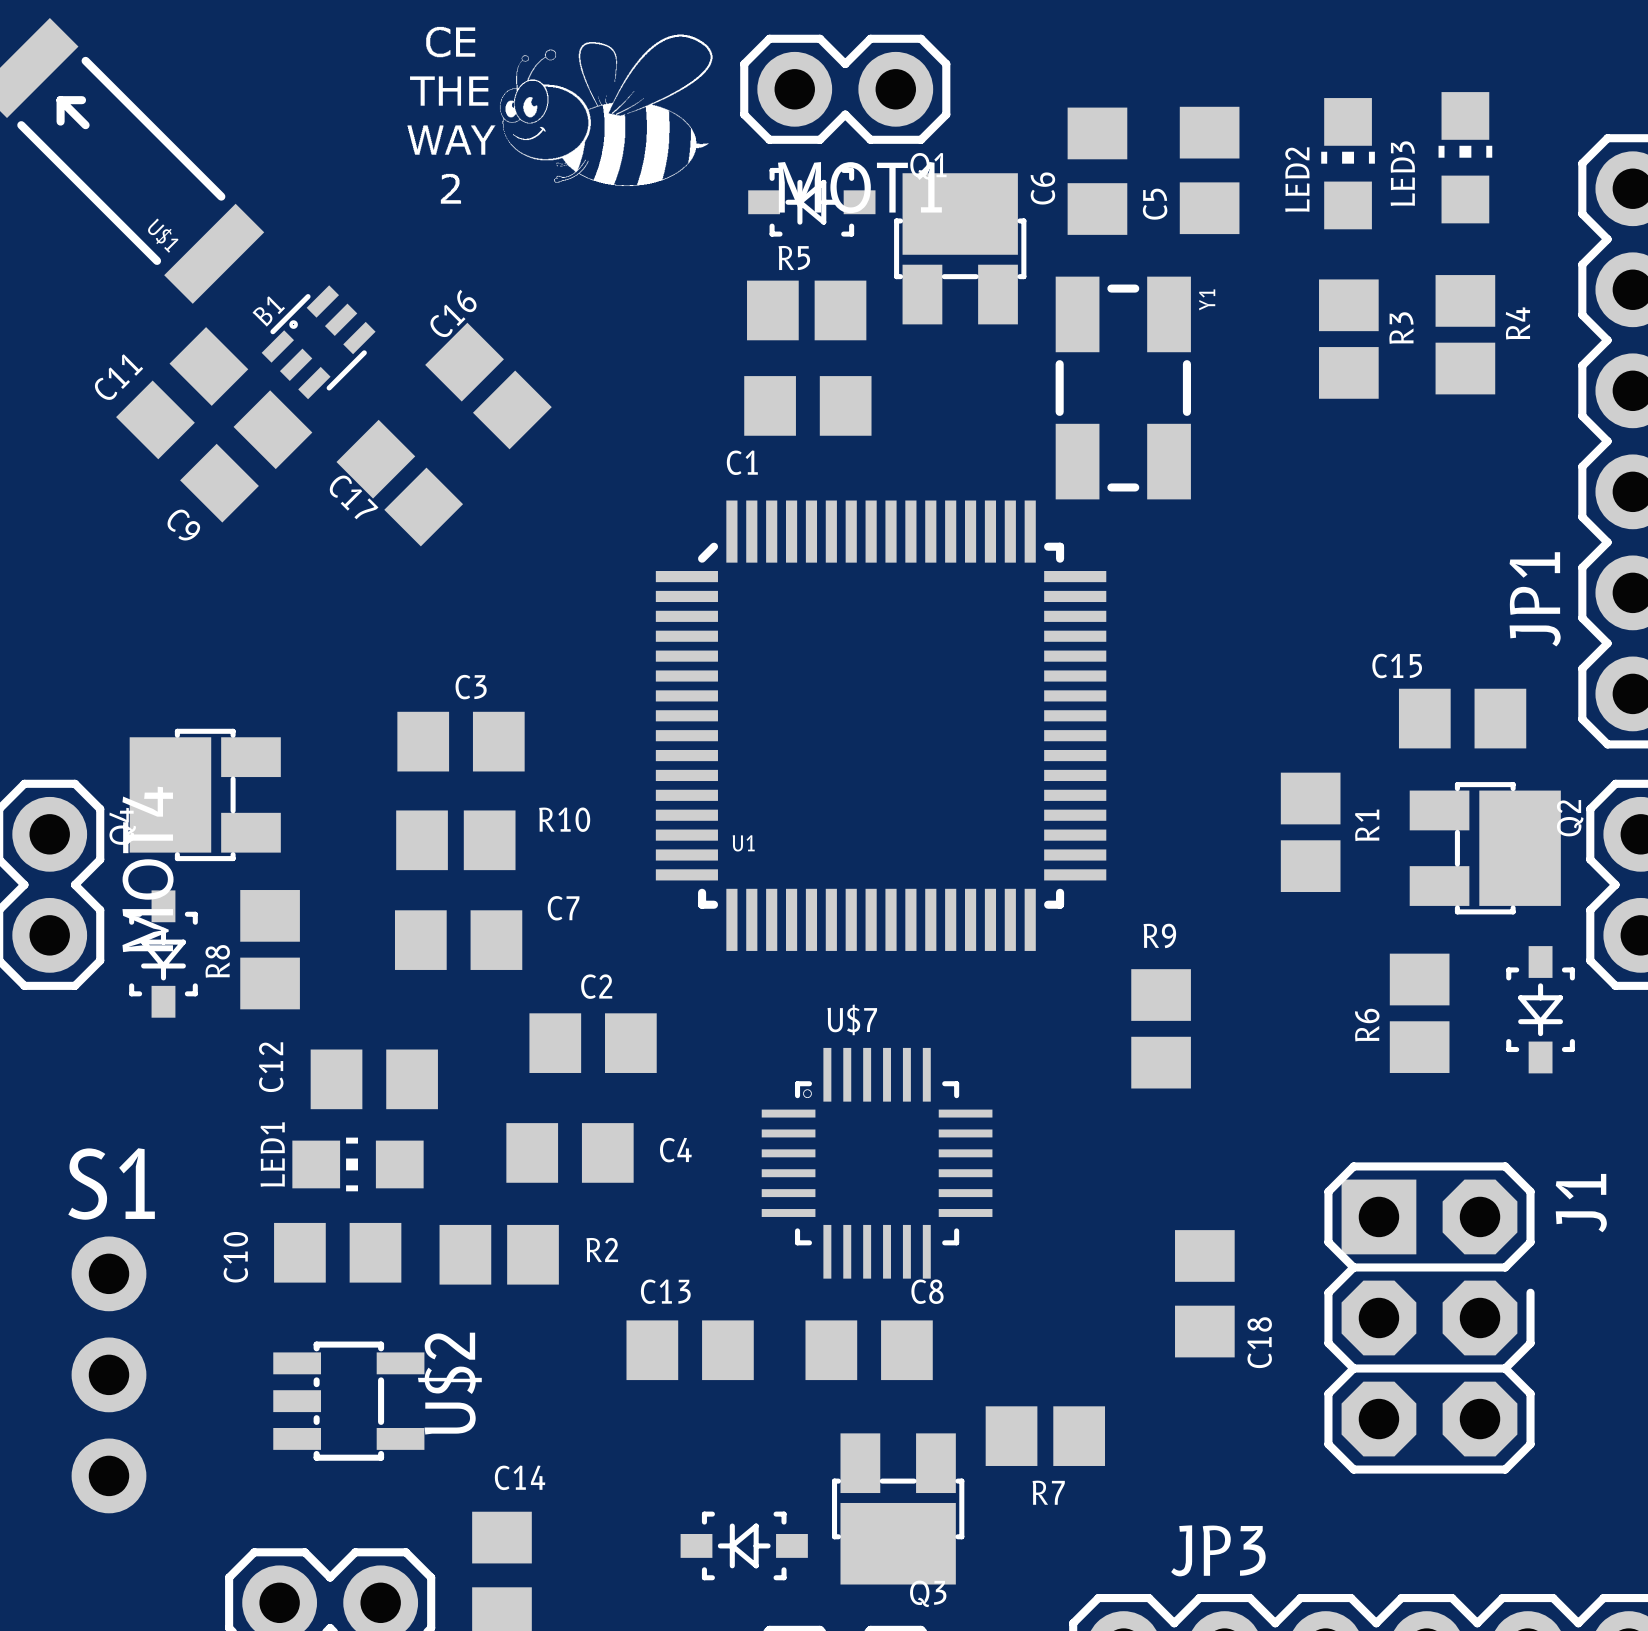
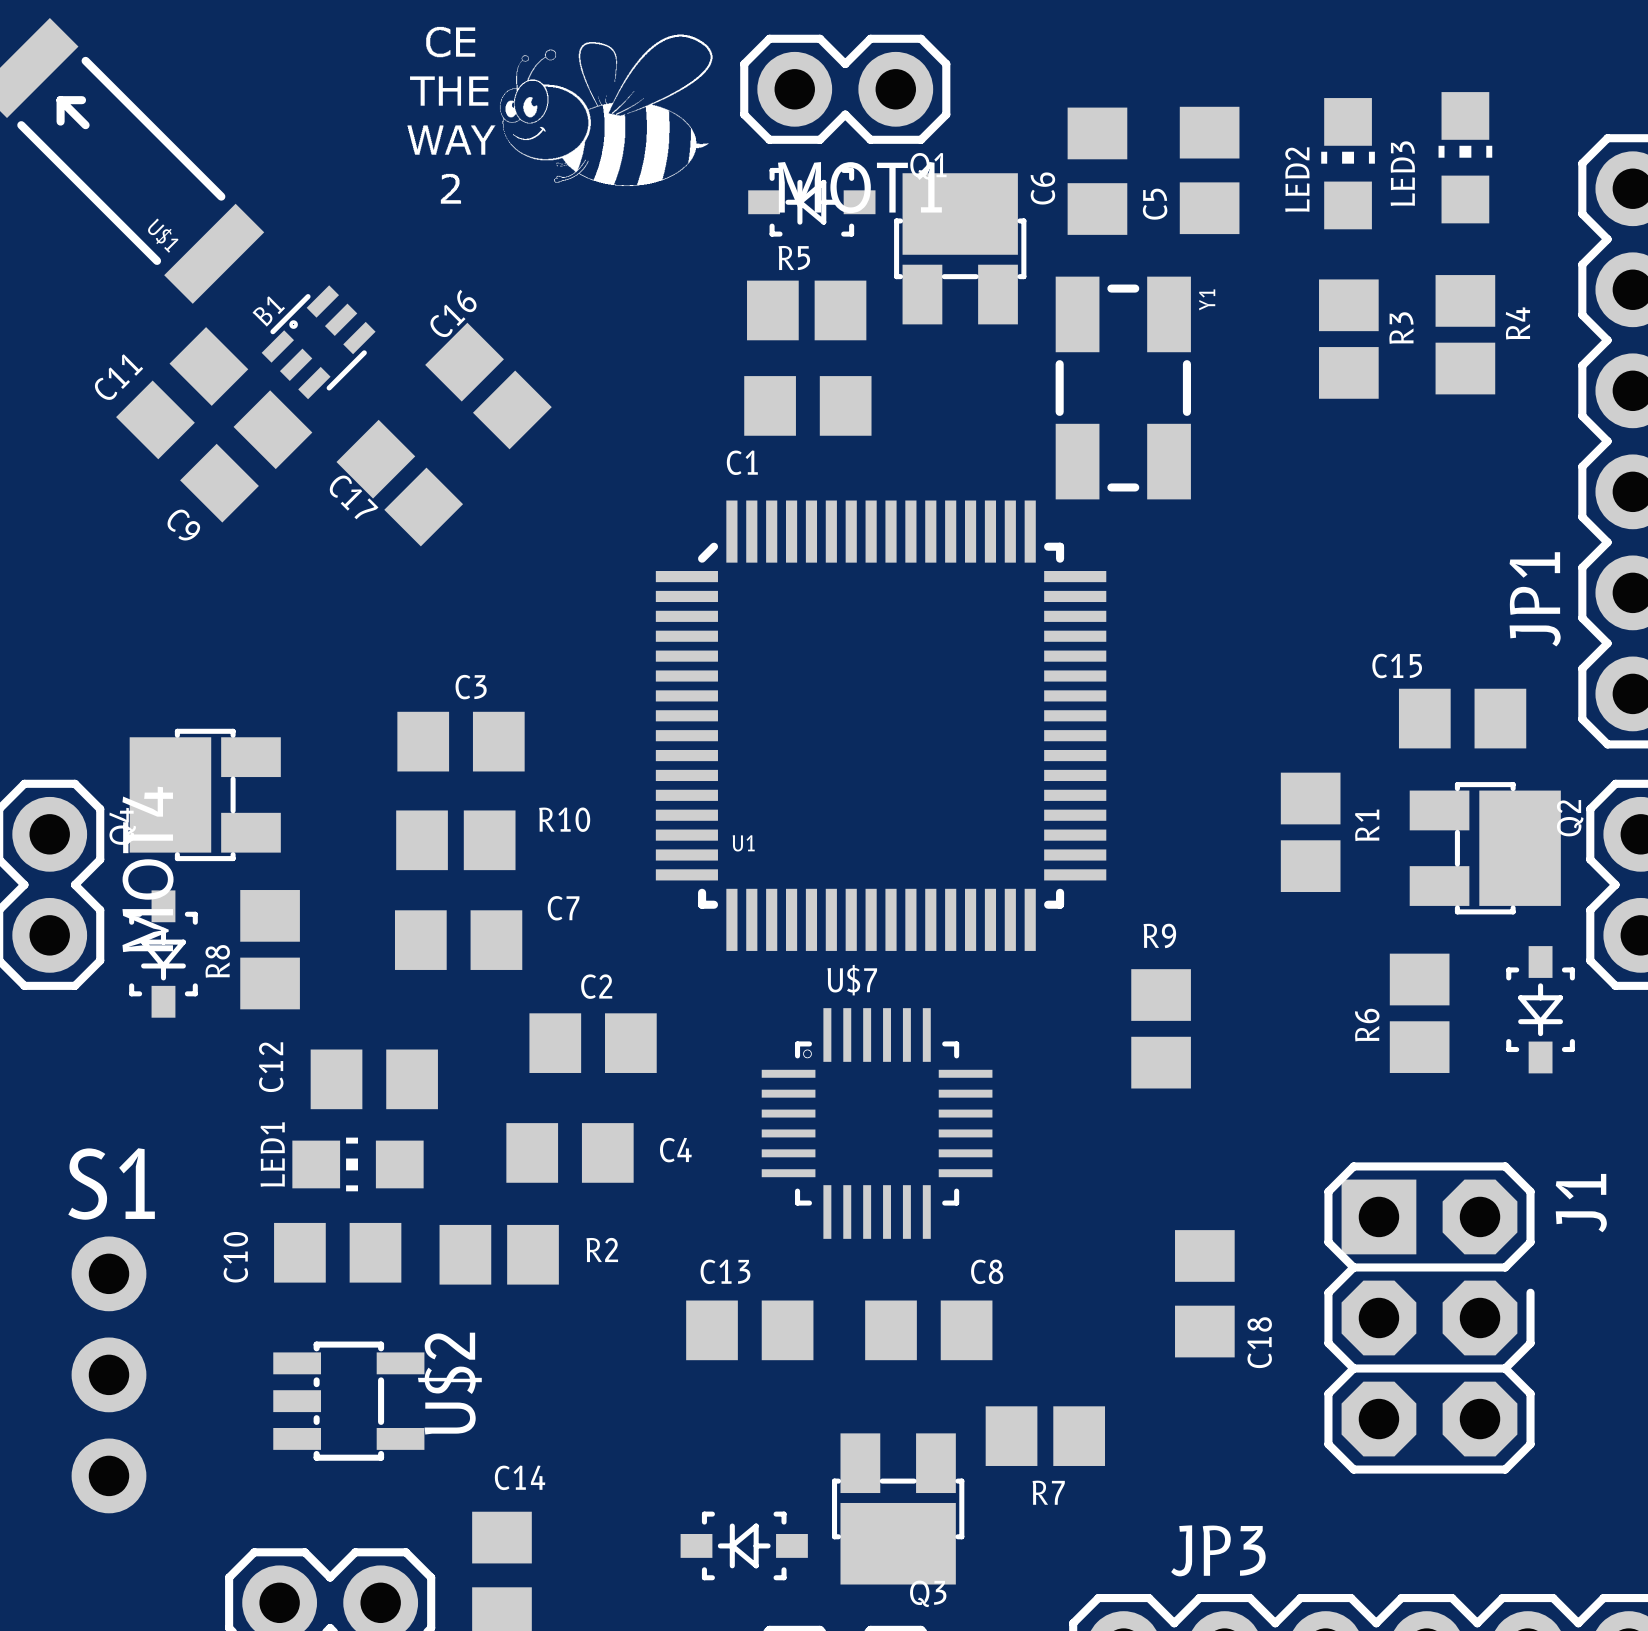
U$7 position: (877, 1163) -> (877, 1123)
C13 position: (690, 1350) -> (749, 1330)
C8 position: (869, 1350) -> (928, 1330)

